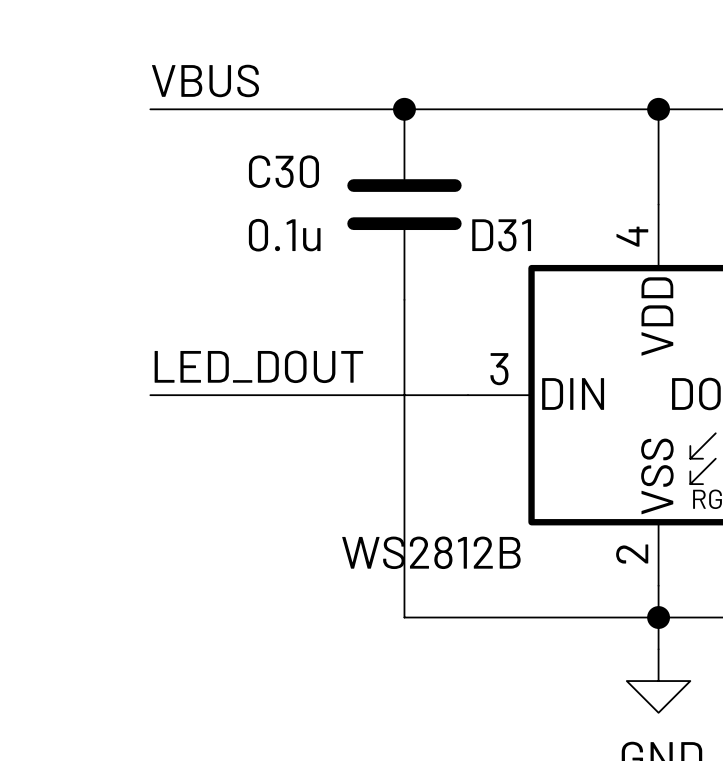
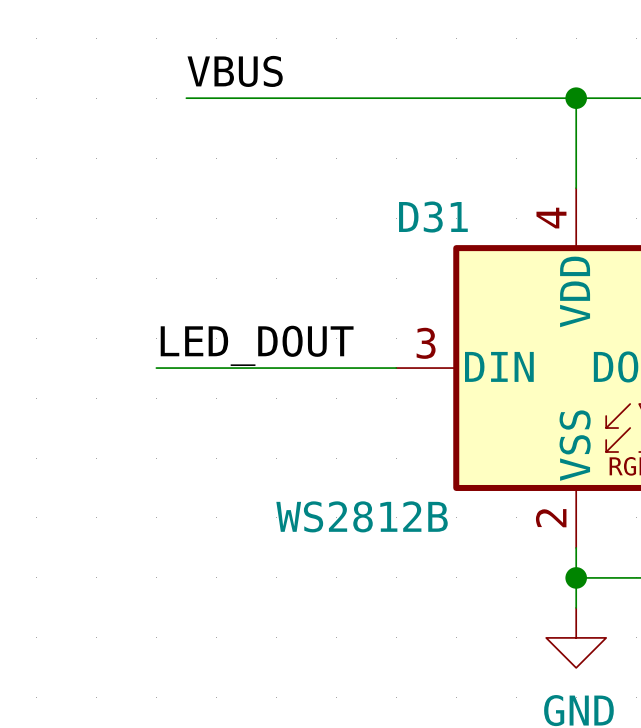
label position: VBUS (205, 80) -> VBUS (235, 71)
wire: (150, 109) (245, 109) -> none
junction: (404, 109) -> none
C30: 0.1u (404, 204) -> none
wire: (404, 299) (404, 617) (658, 617) -> none
label position: LED_DOUT (258, 366) -> LED_DOUT (257, 345)
wire: (150, 395) (213, 395) -> none

